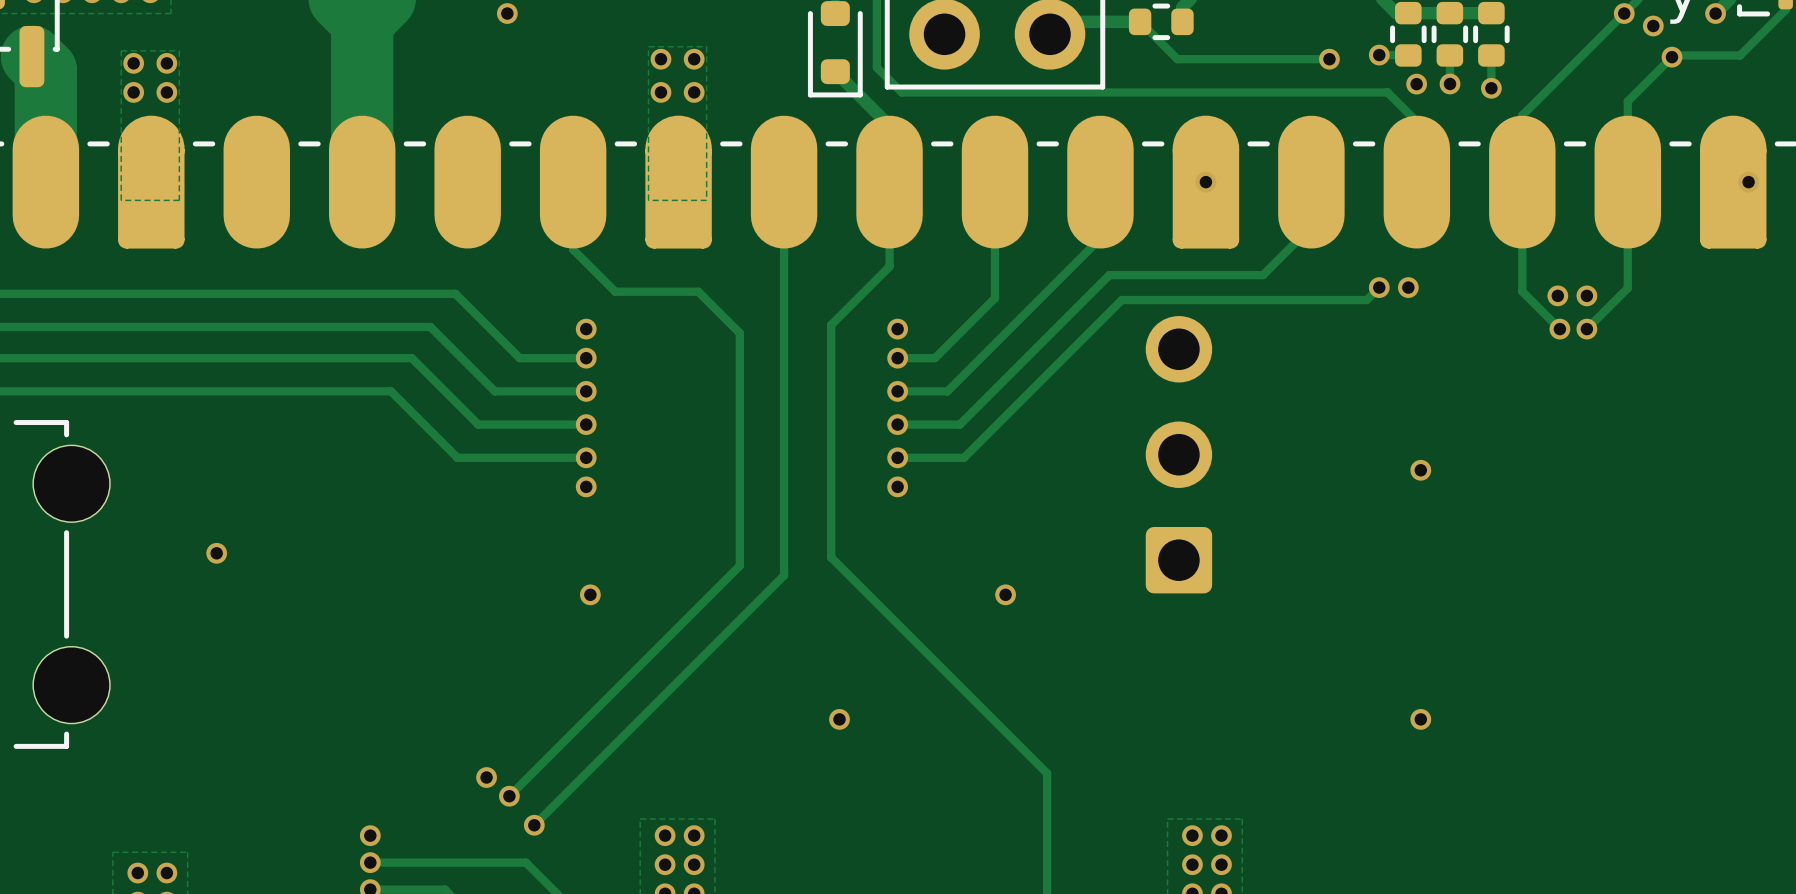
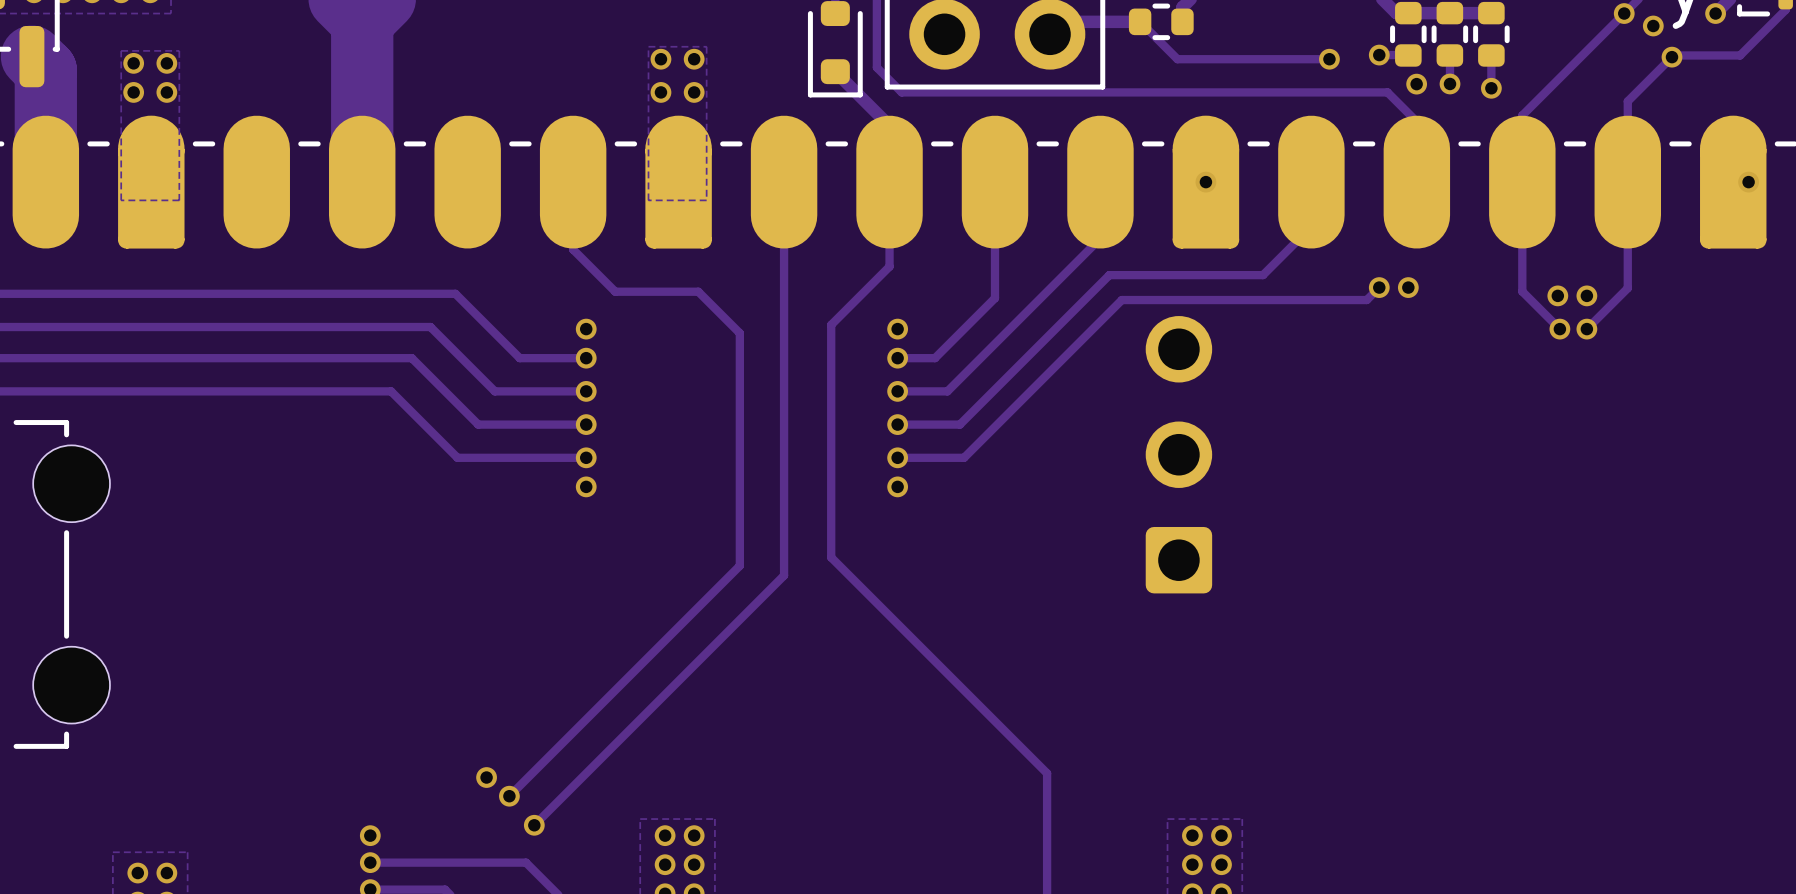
via: (507, 13) -> none
via: (1420, 470) -> none
via: (216, 553) -> none
via: (590, 594) -> none
via: (1005, 594) -> none
via: (839, 719) -> none
via: (1420, 719) -> none

